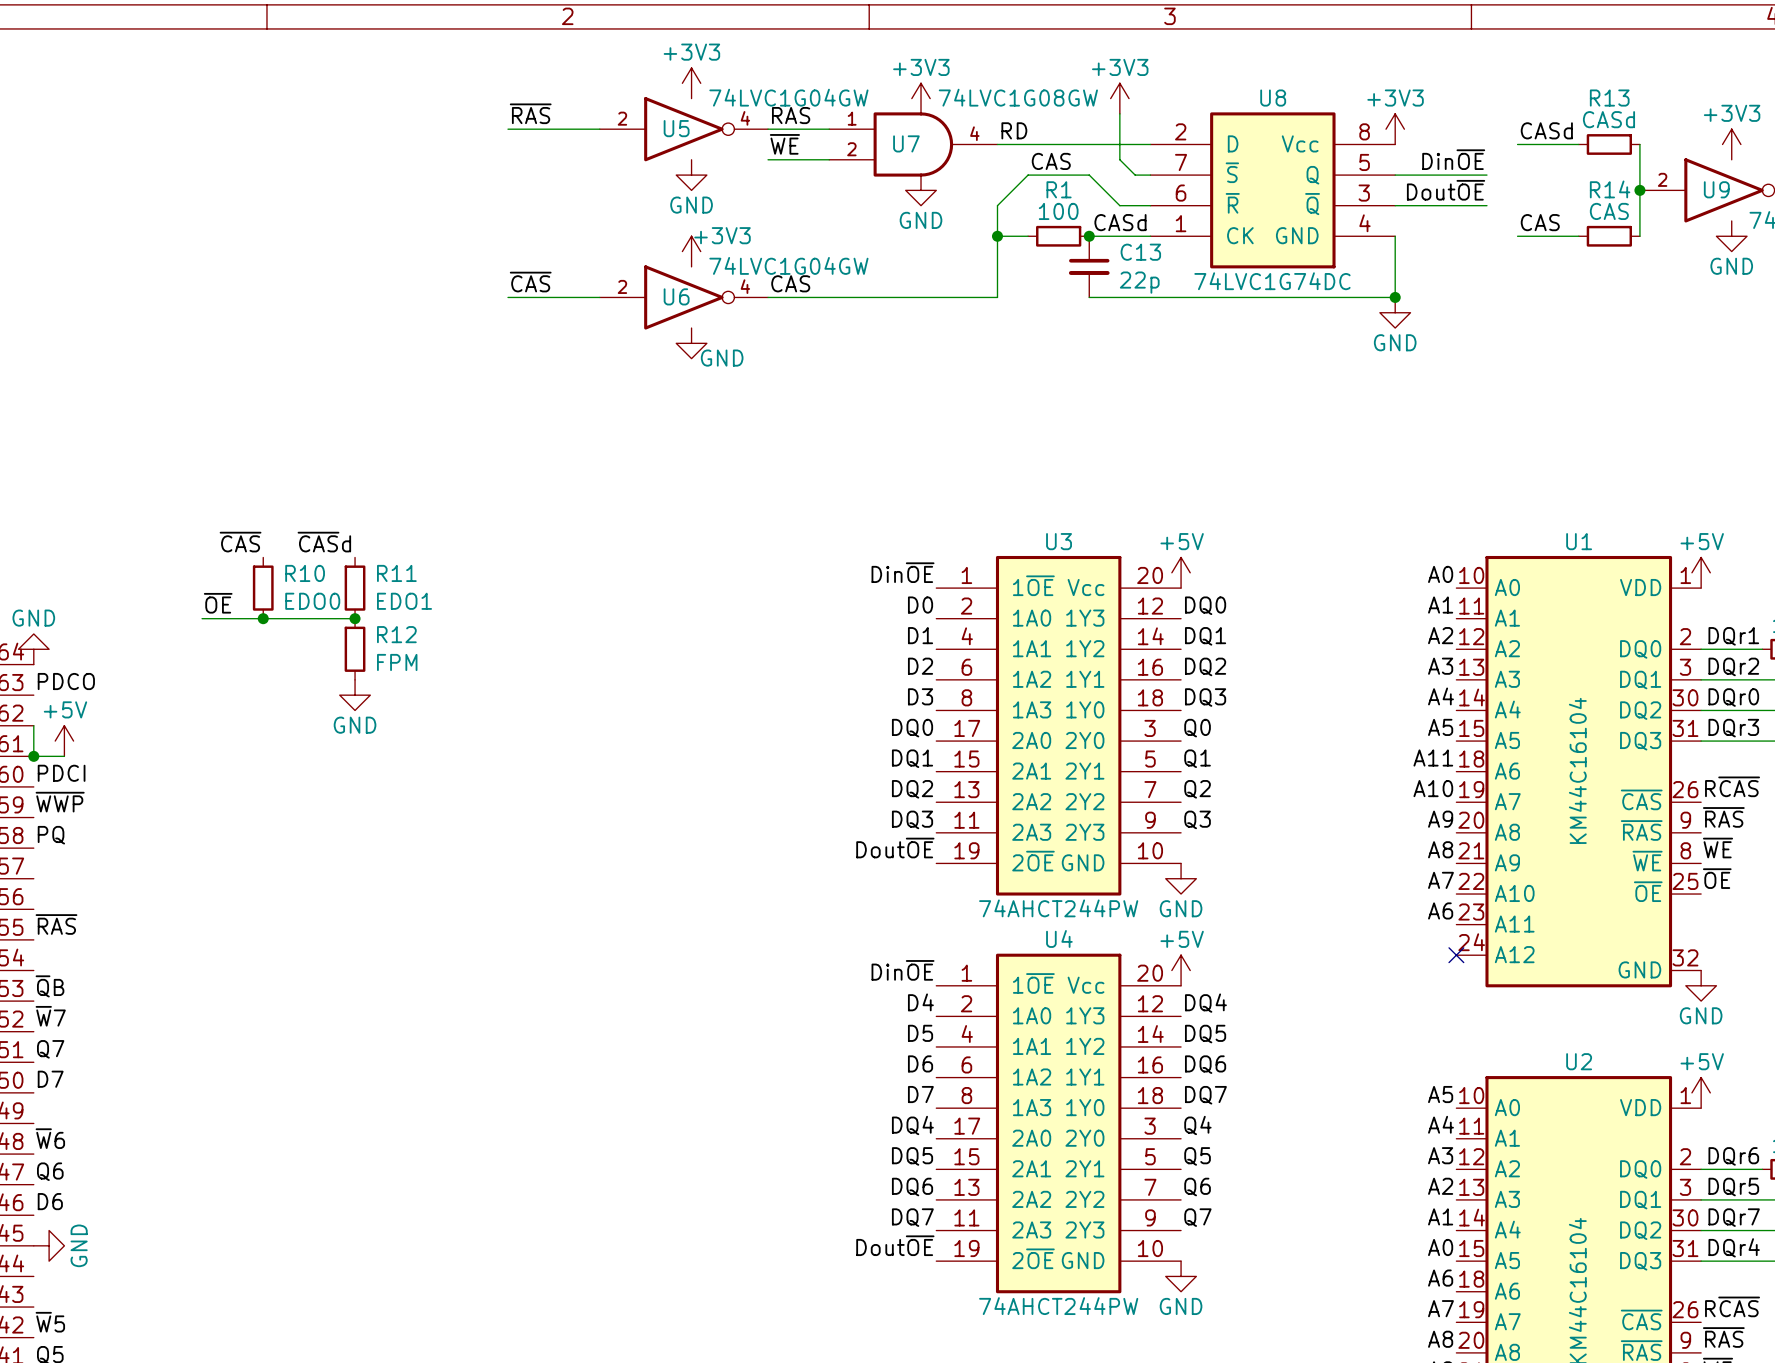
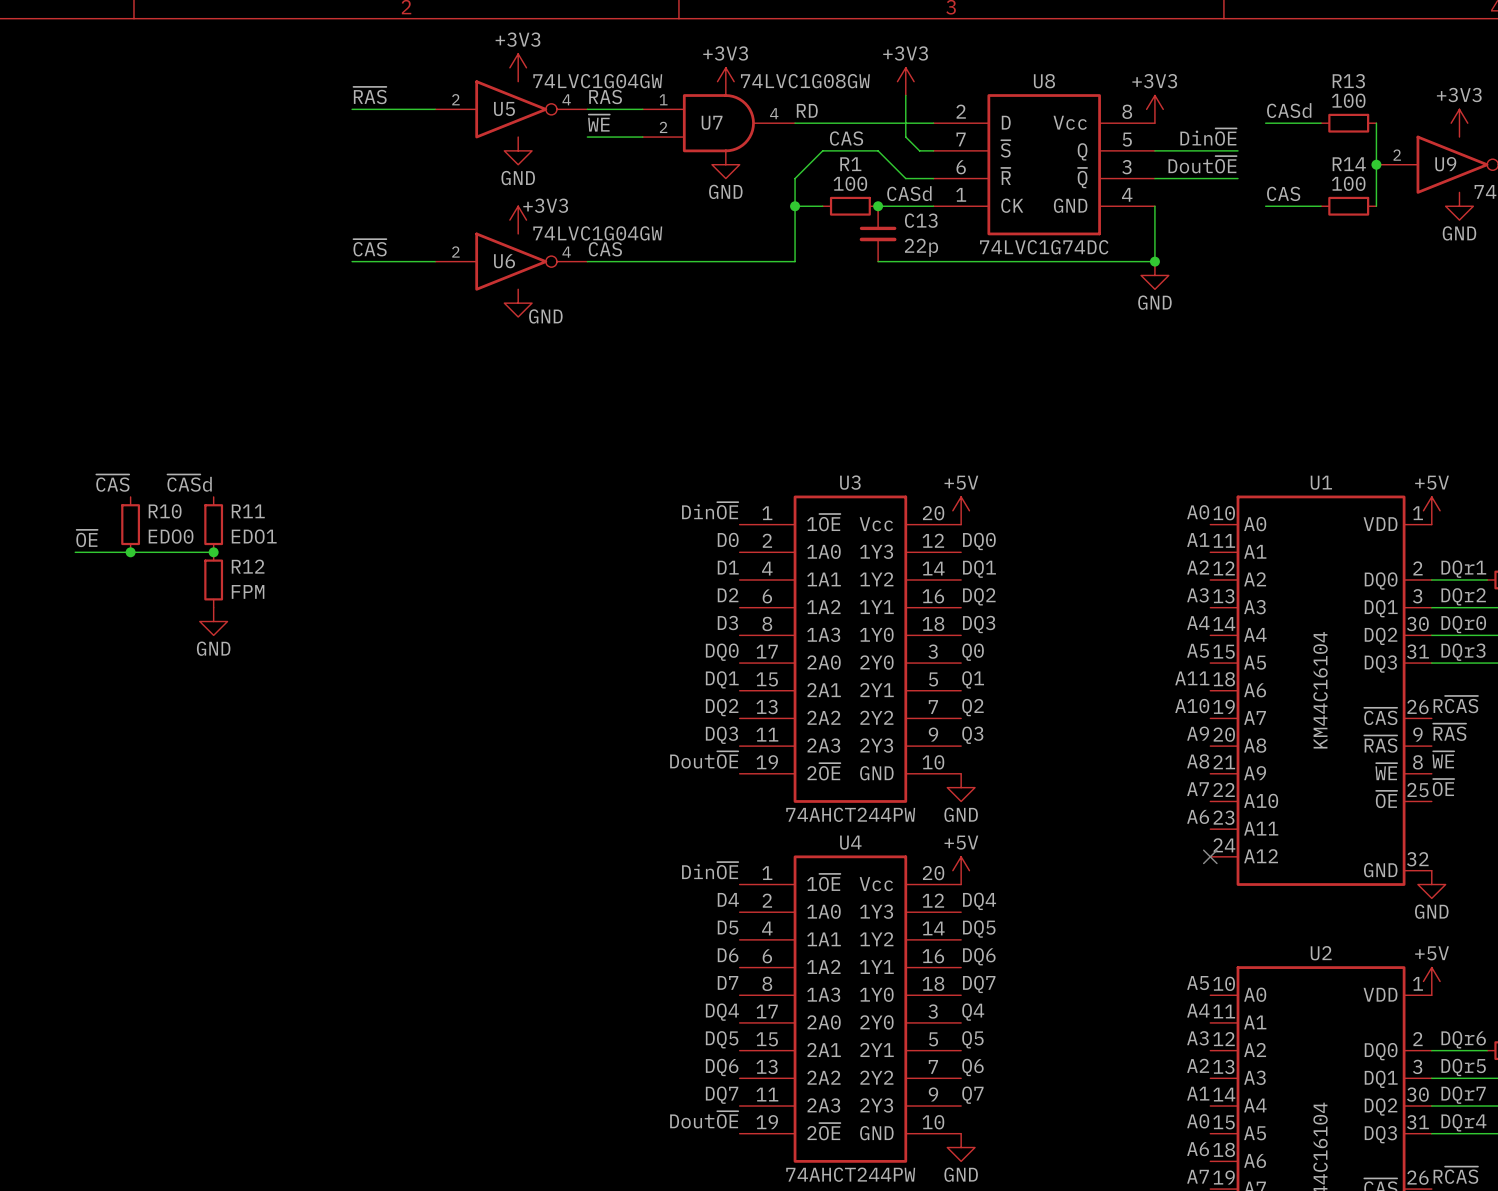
R13 value: CASd (1608, 119) -> 100 (1348, 100)
R14 value: CAS (1609, 211) -> 100 (1348, 183)

